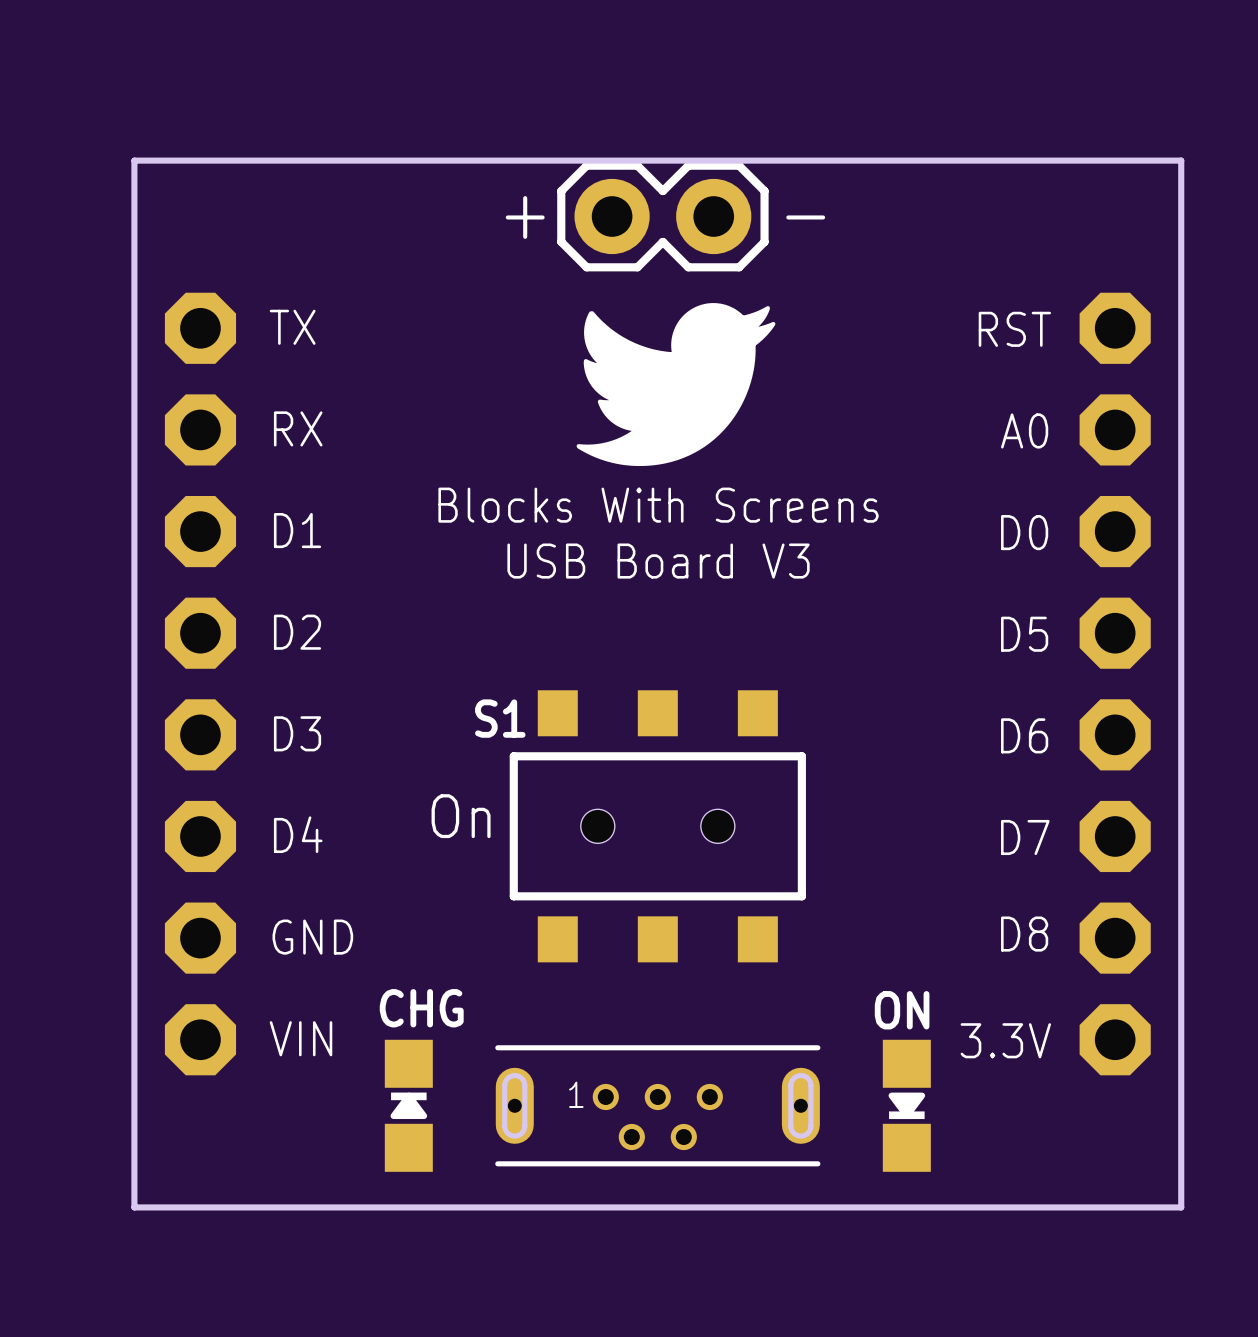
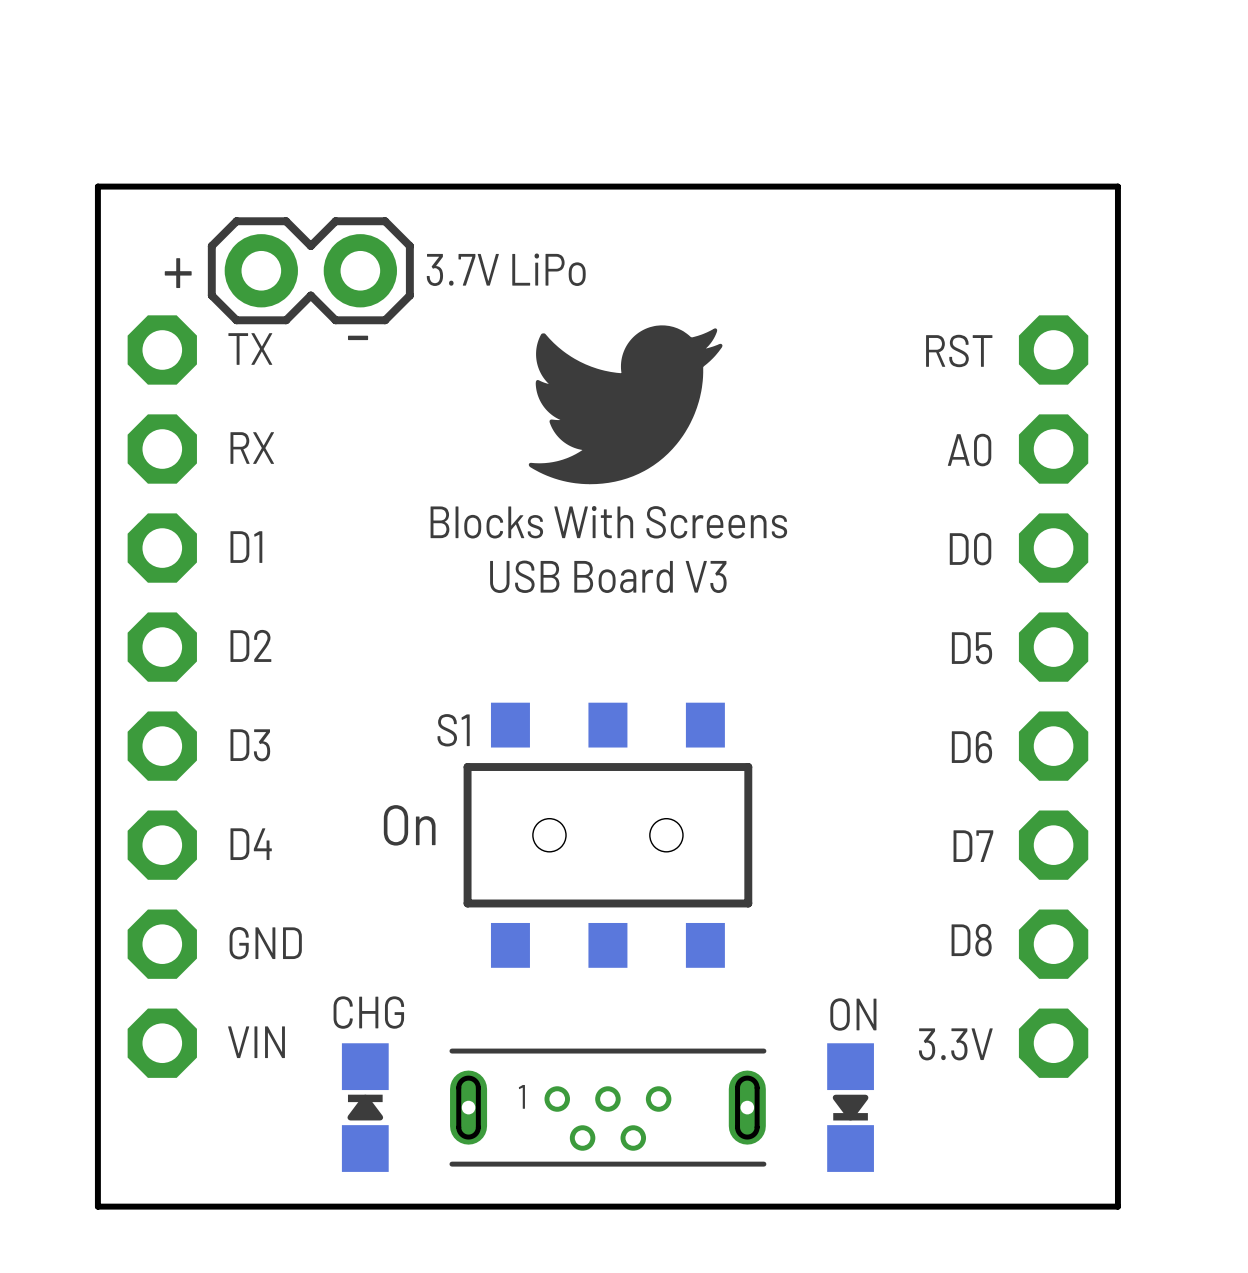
part position: (662, 216) -> (310, 270)
text position: + (525, 217) -> + (178, 273)
text position: - (805, 217) -> - (358, 337)
text: none -> 3.7V LiPo (506, 269)

